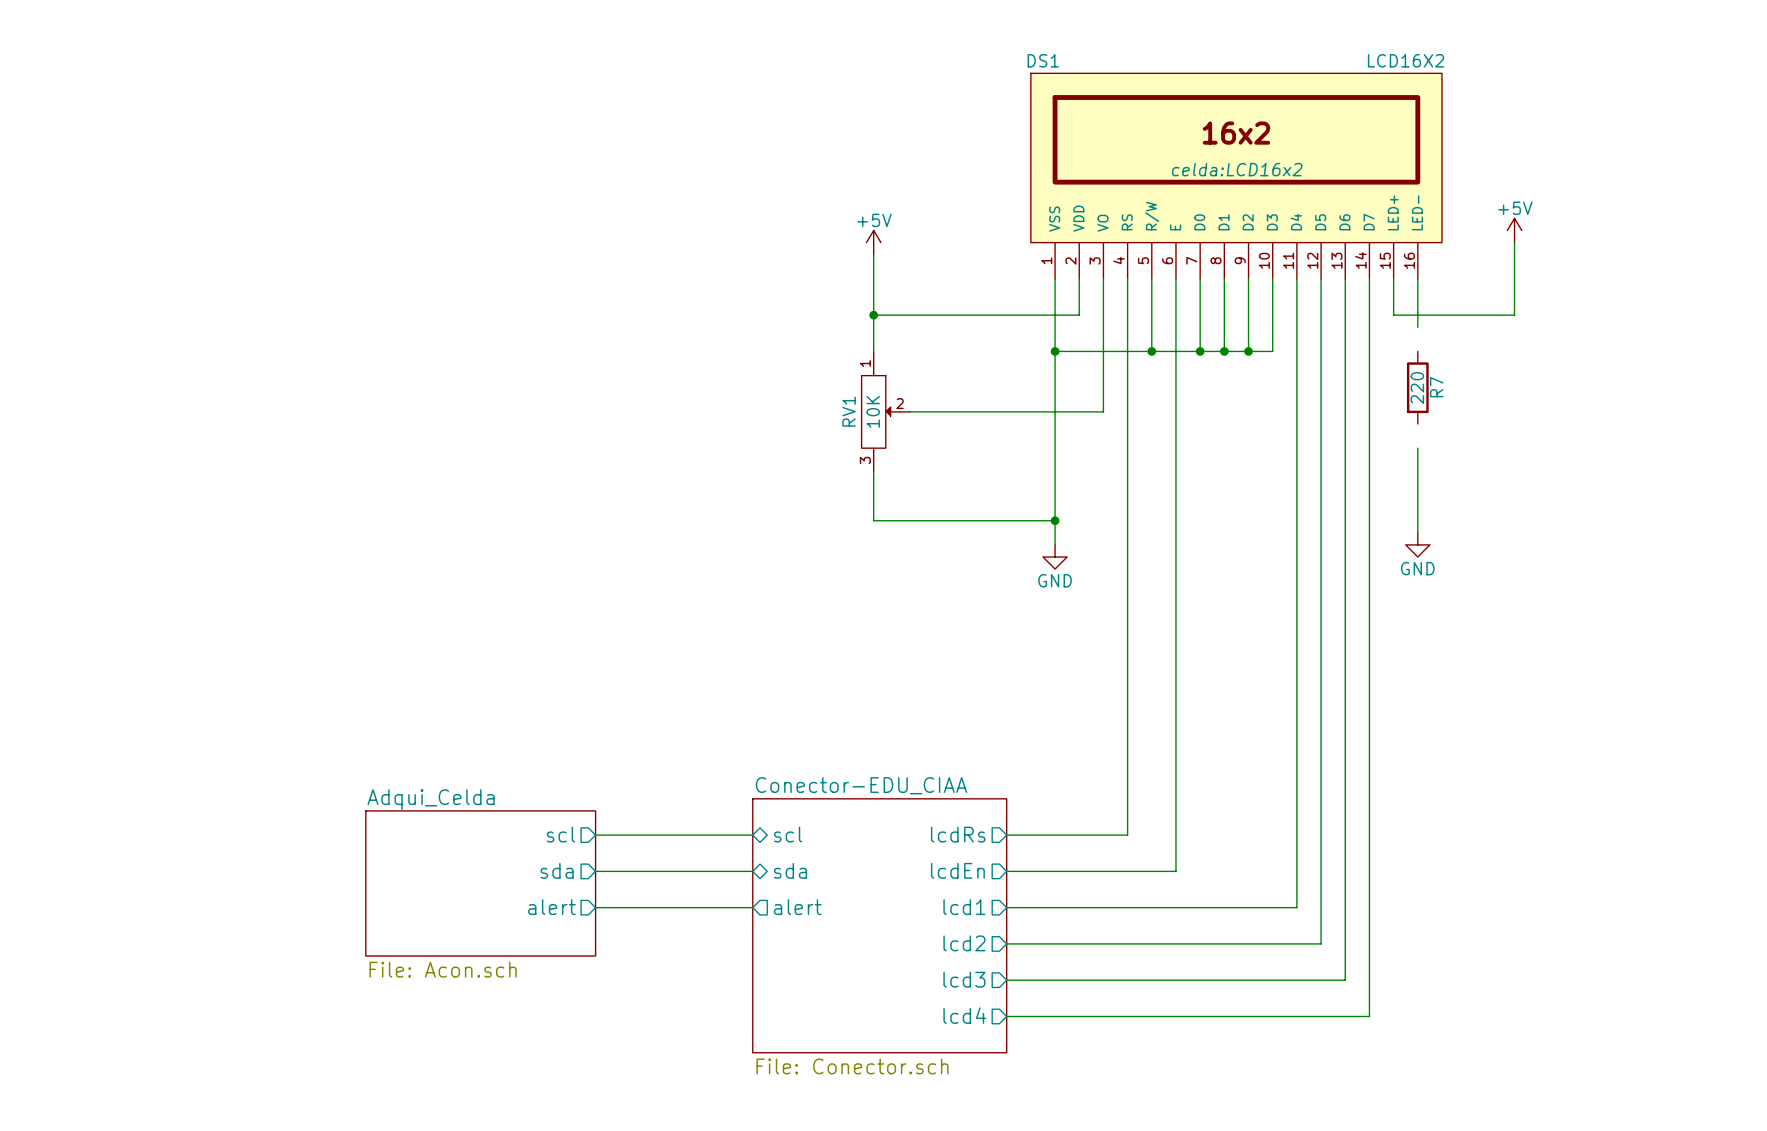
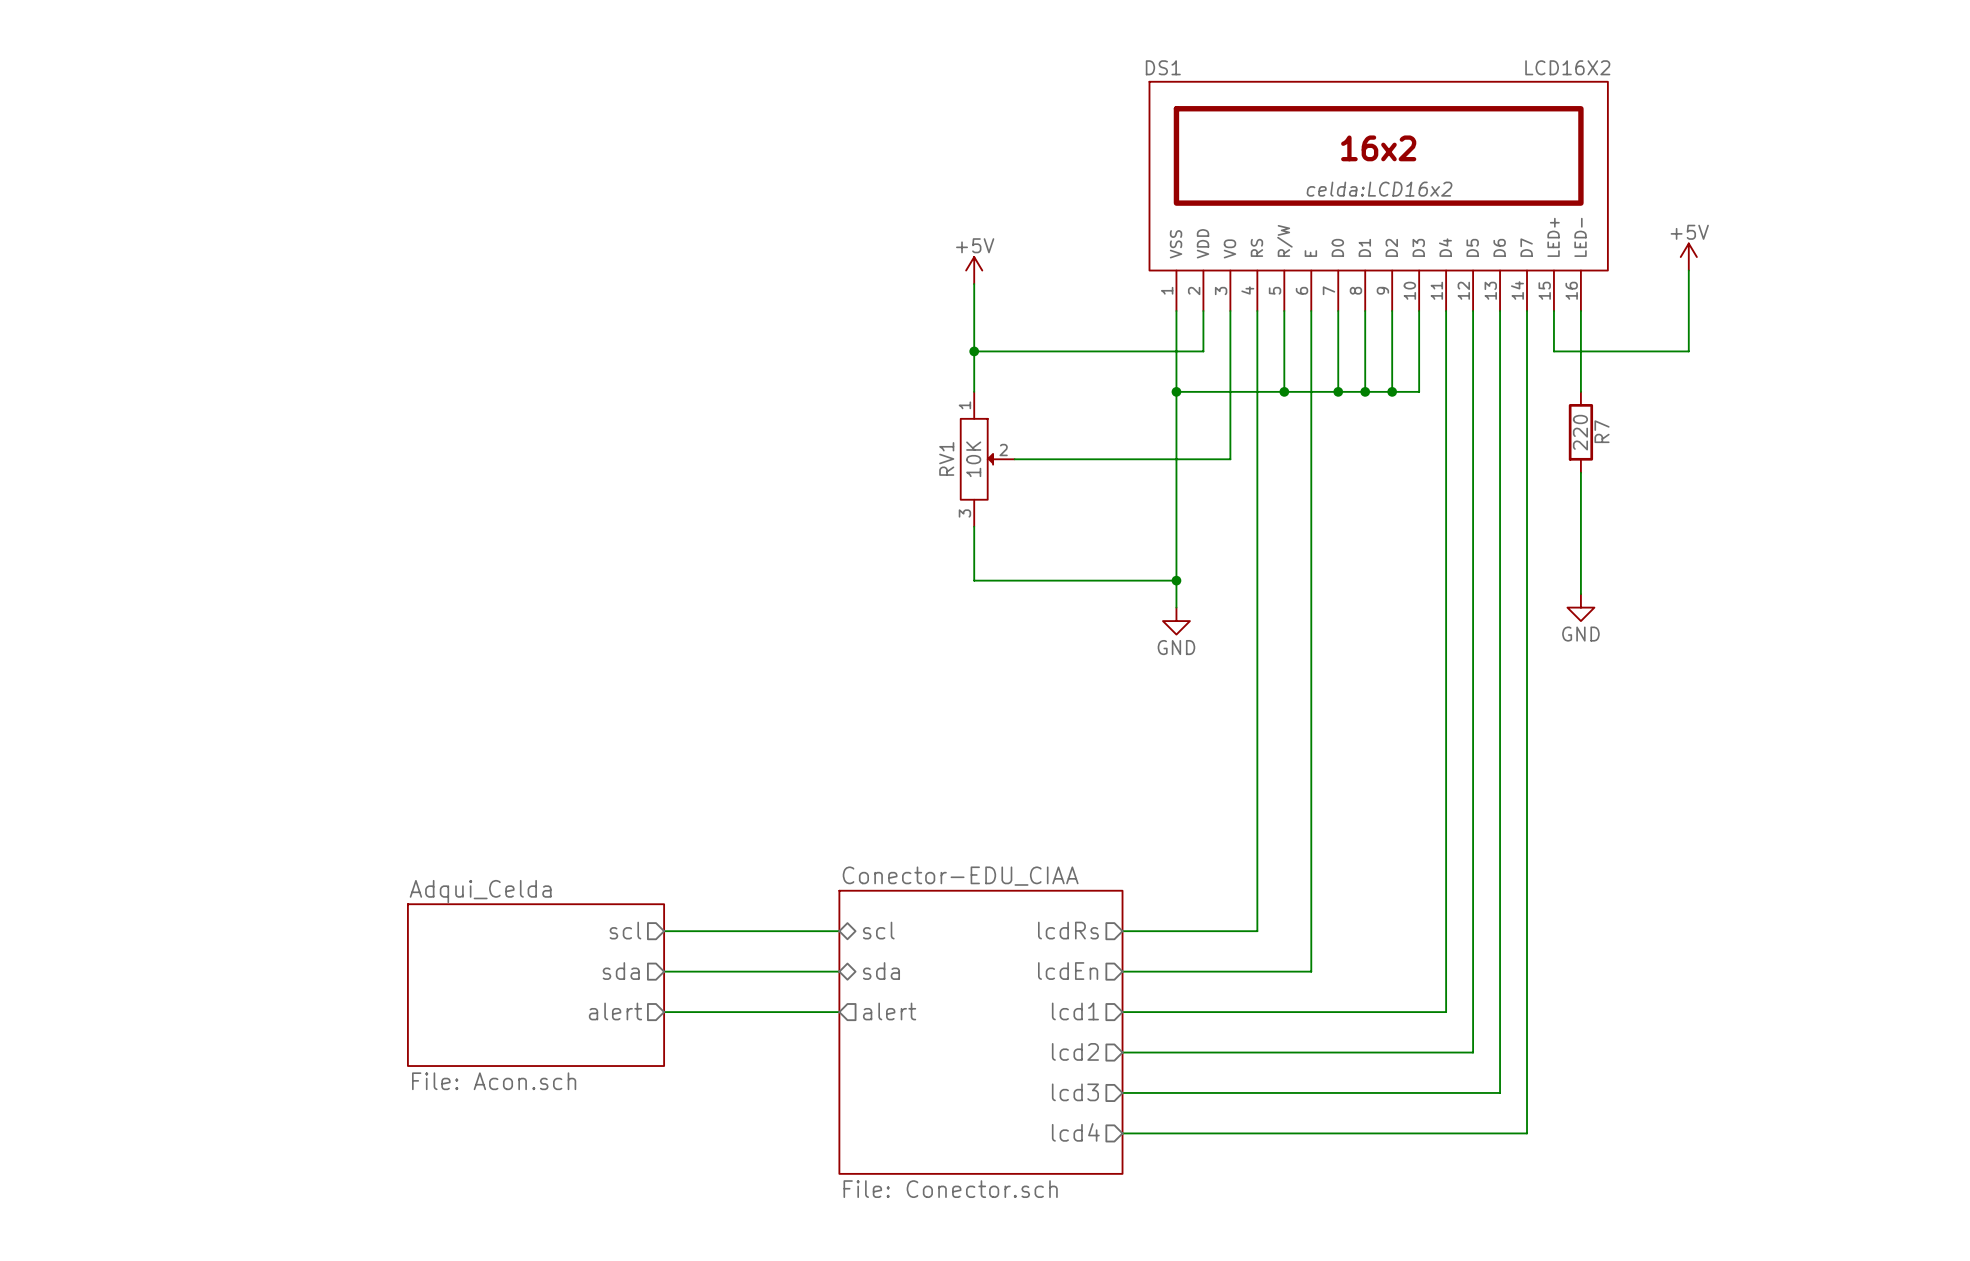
wire: none -> (1580, 364) (1580, 391)
wire: none -> (1580, 472) (1580, 499)

